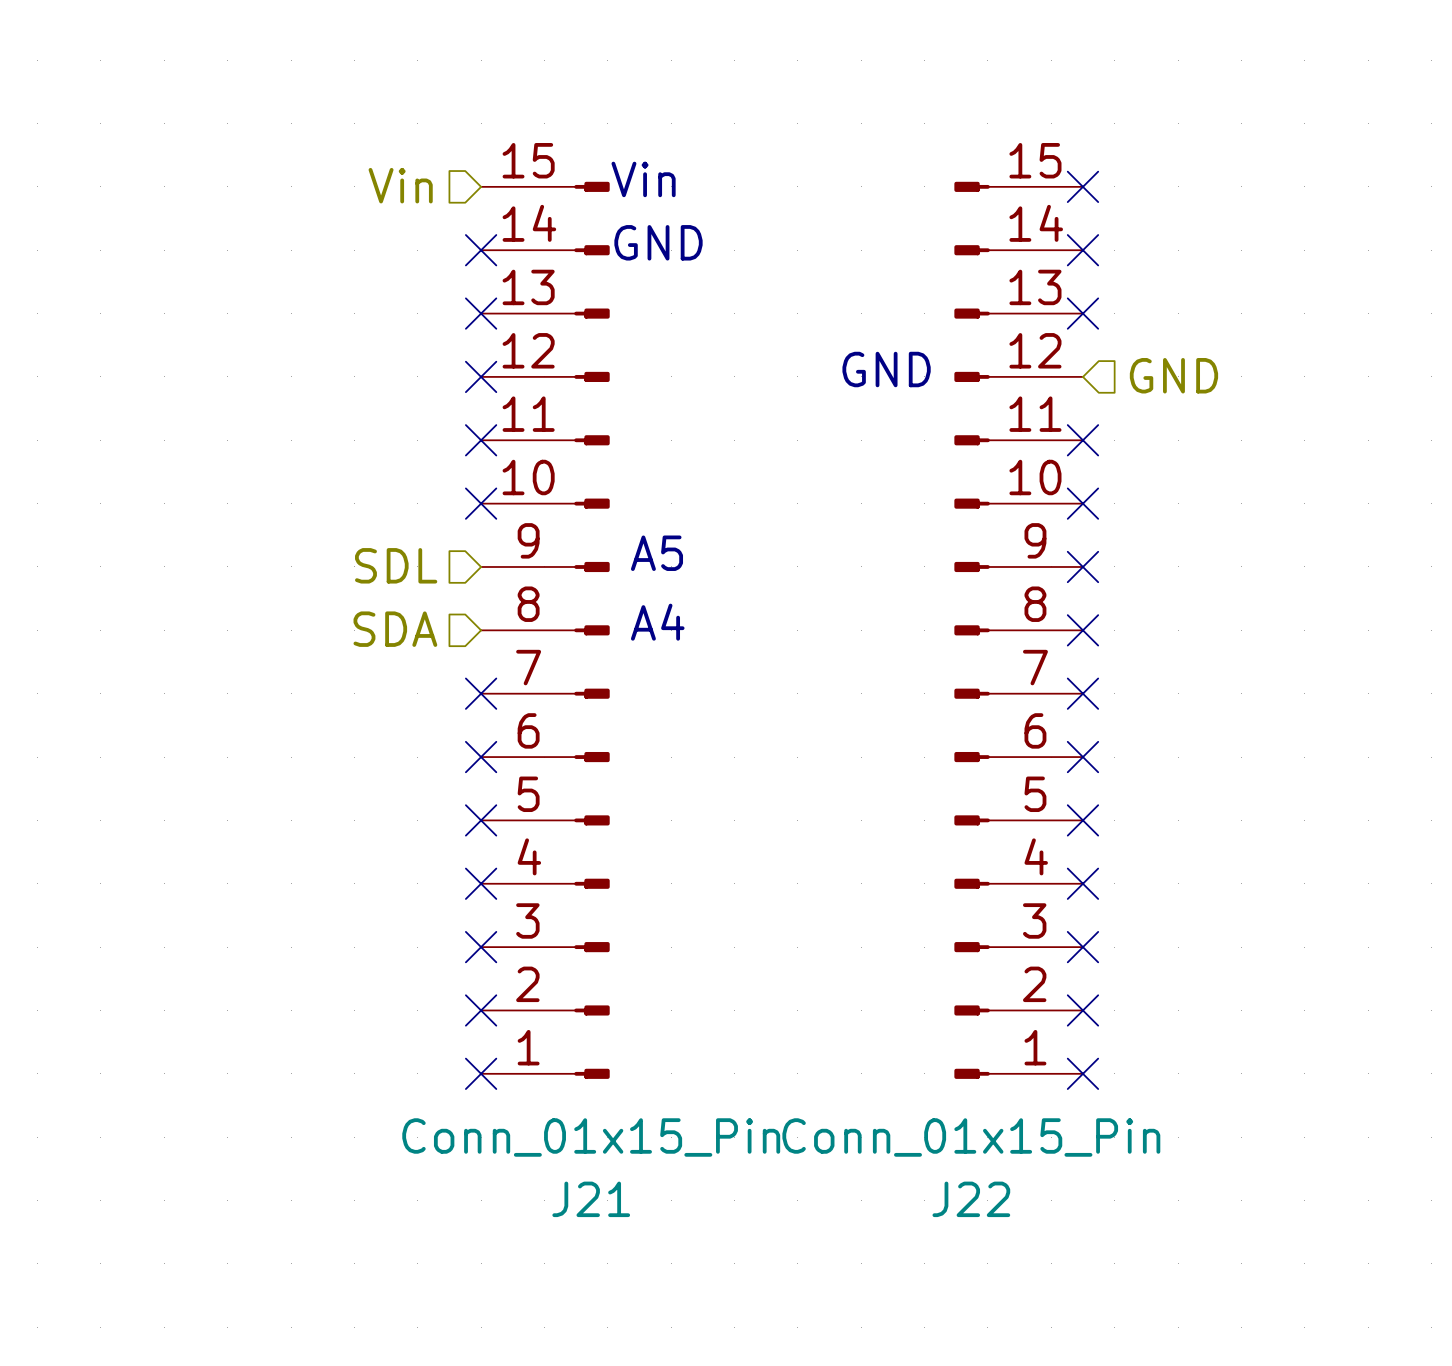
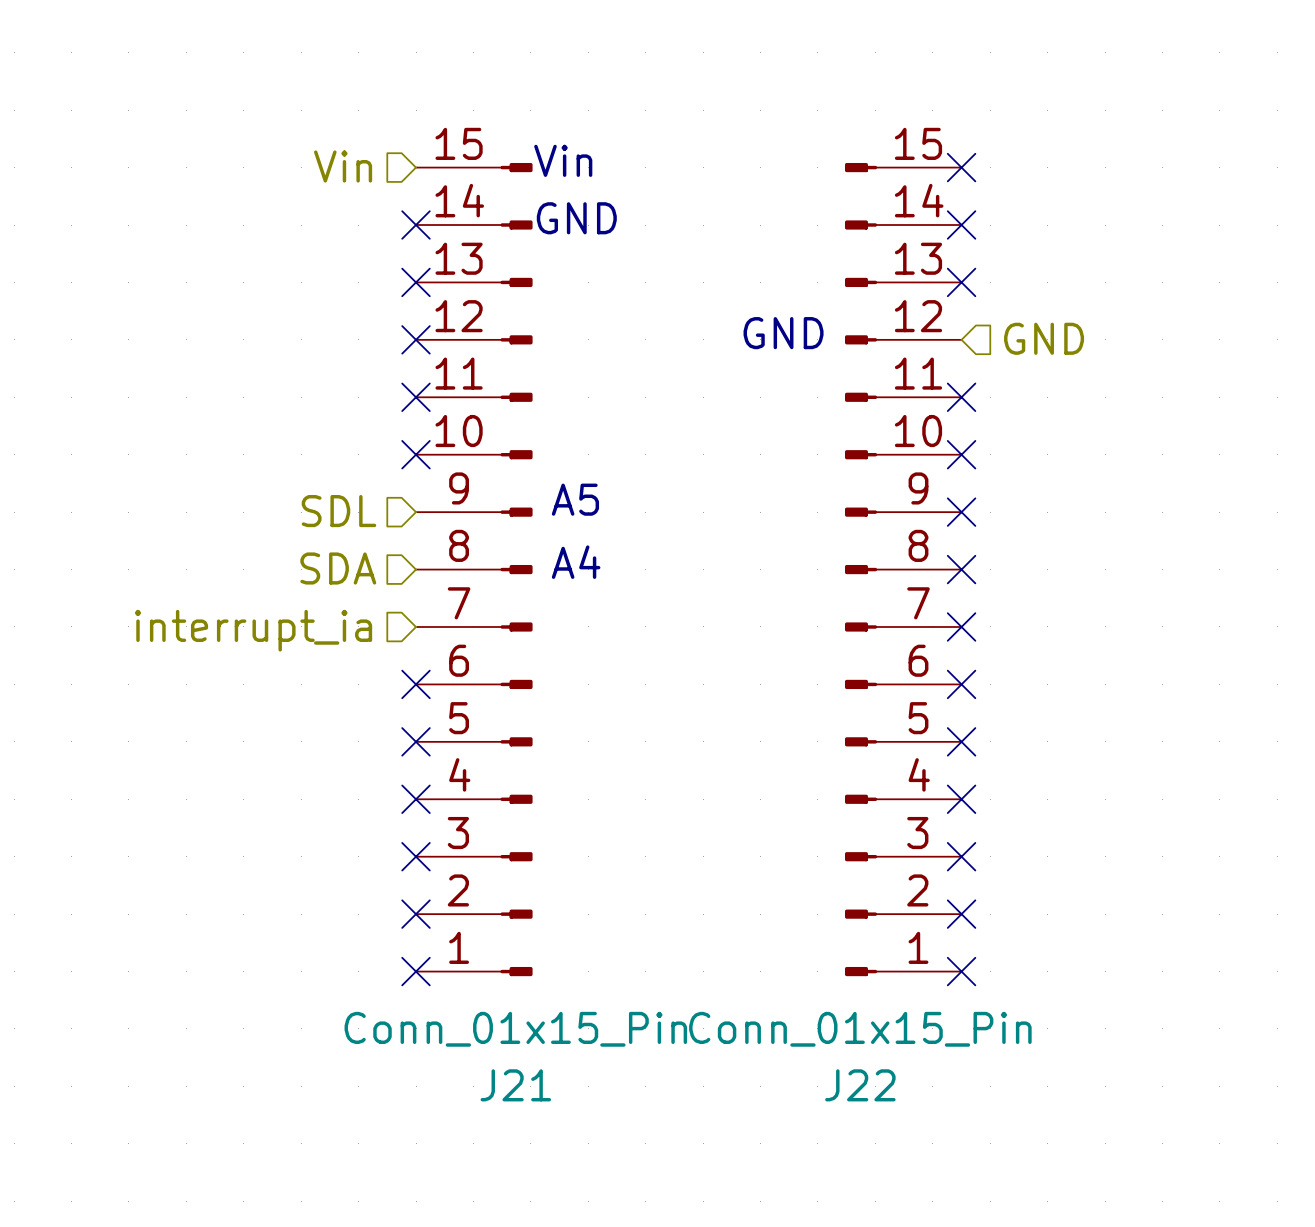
no-connect mark: (481, 693) -> none
hierarchical label: none -> interrupt_ia (253, 630)

